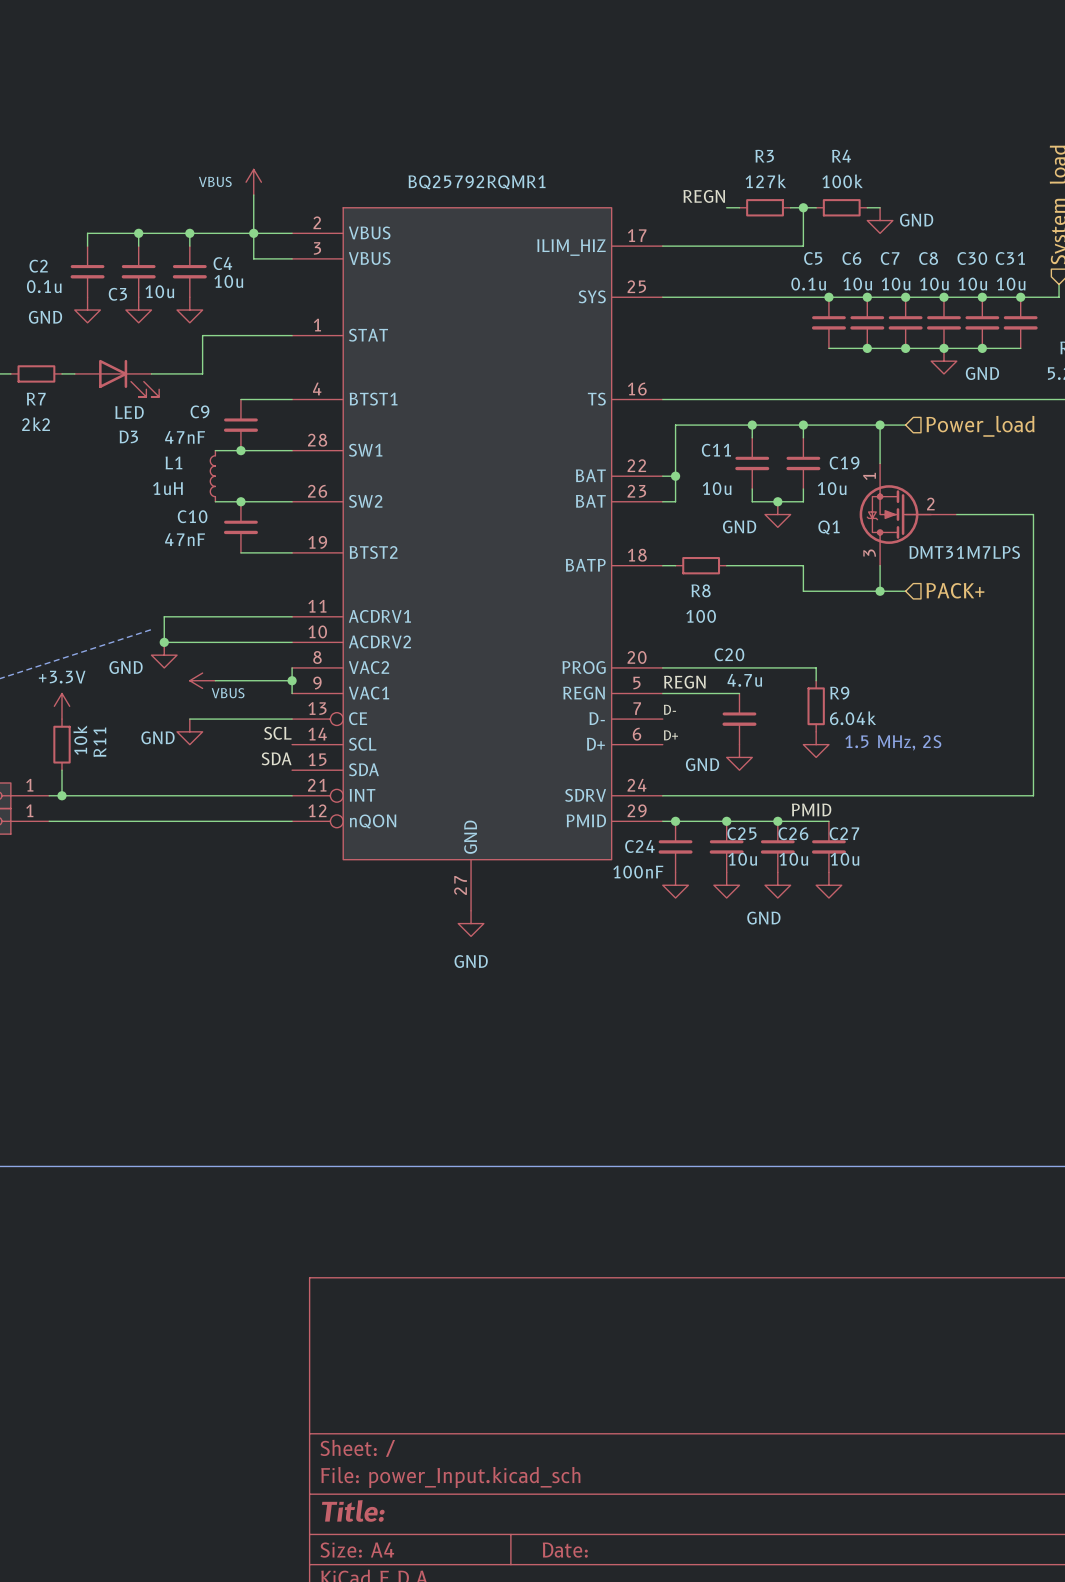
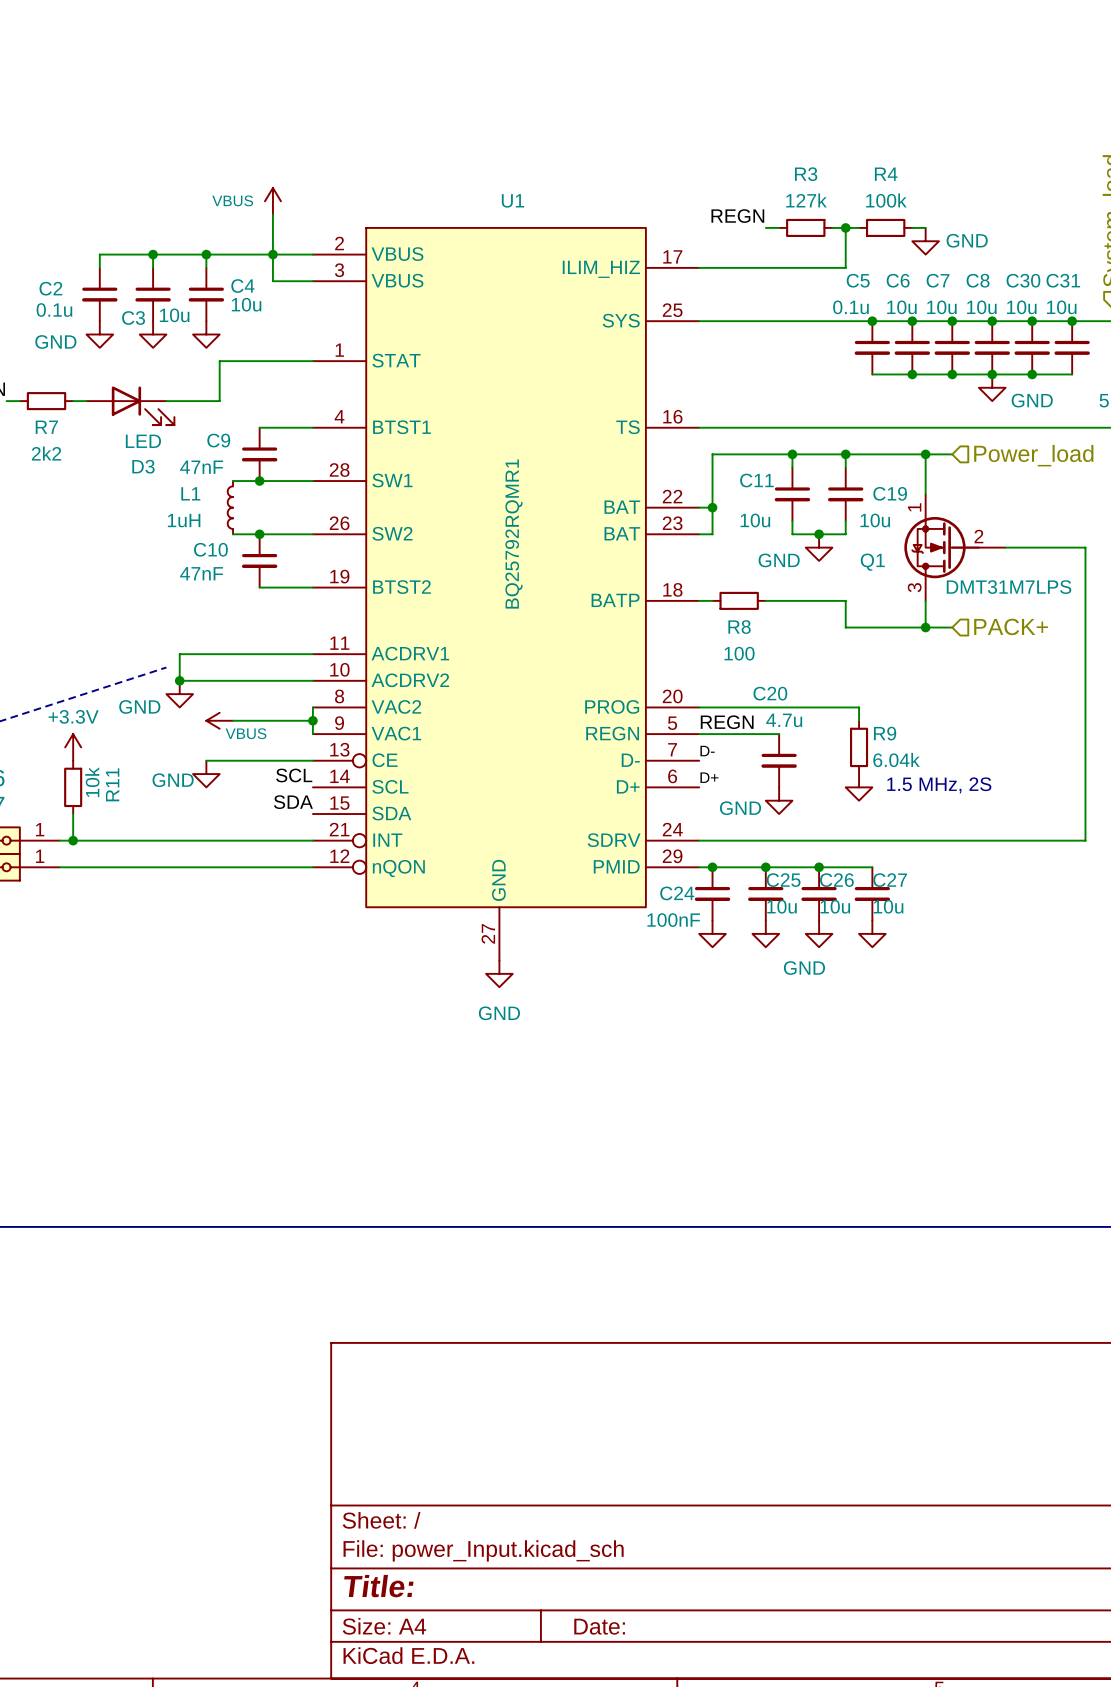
BQ25792RQMR1 name: BQ25792RQMR1 (477, 182) -> U1 (513, 200)
BQ25792RQMR1 value: none -> BQ25792RQMR1 (513, 533)
label: PMID (811, 809) -> none

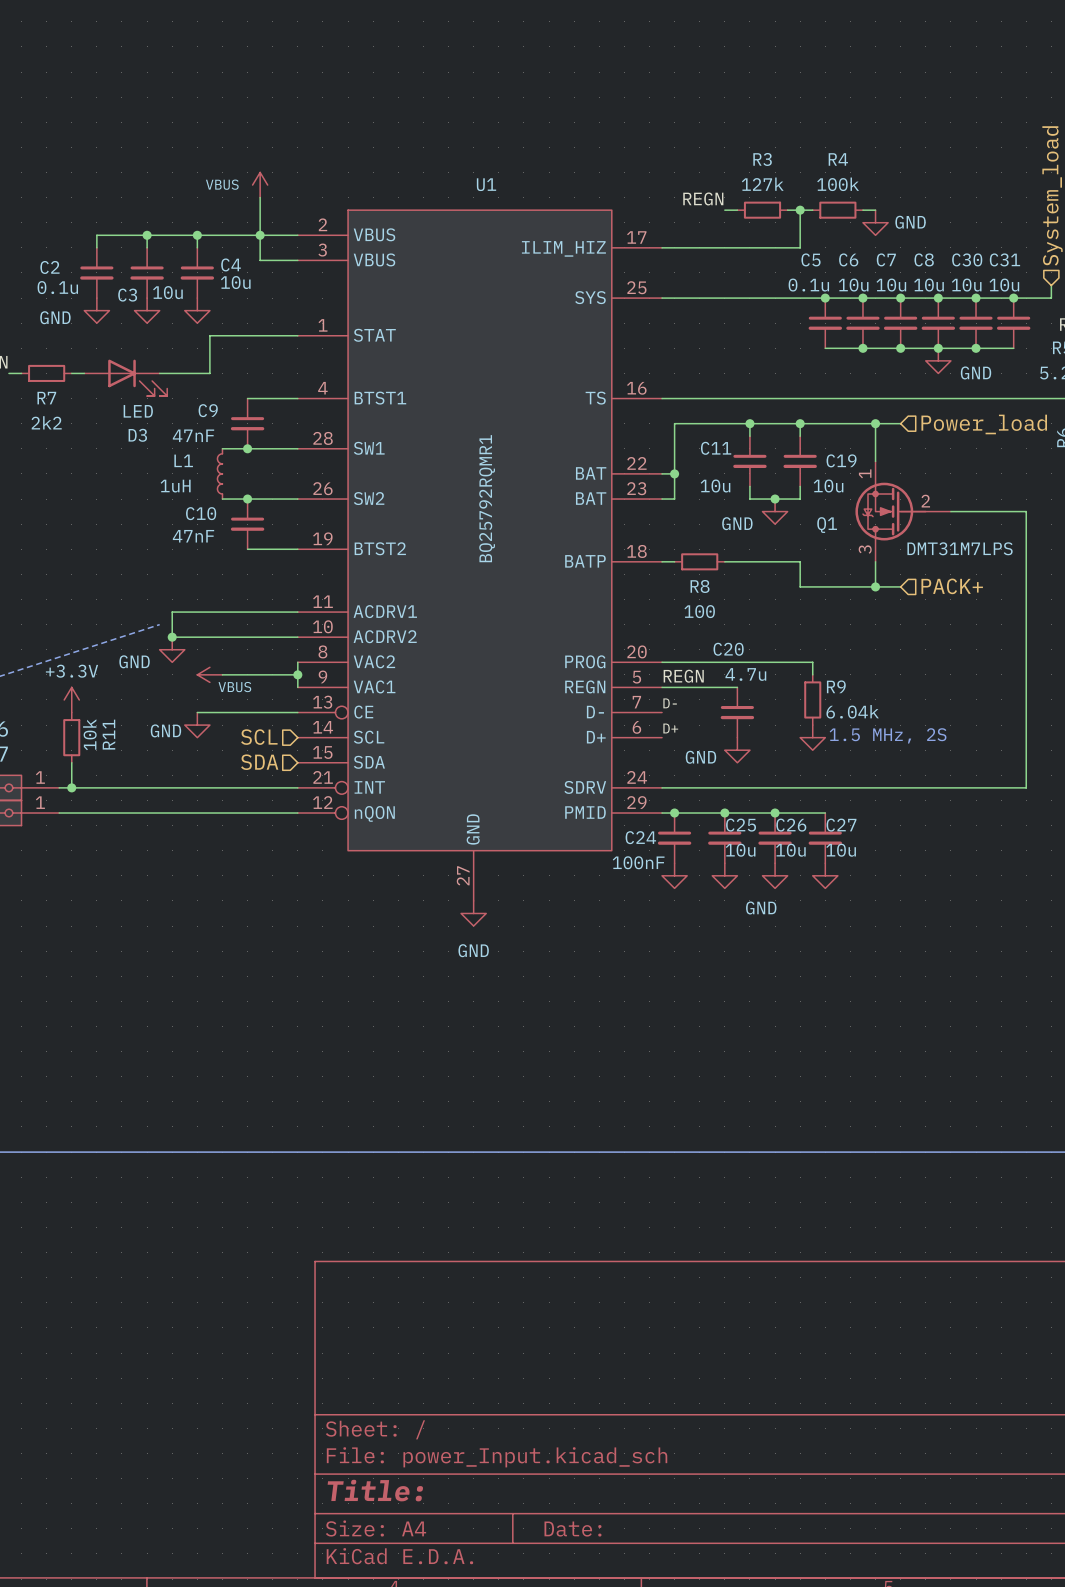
label: SCL (294, 775) -> none
hierarchical label: none -> SCL (259, 737)
label: SDA (293, 802) -> none
hierarchical label: none -> SDA (259, 762)

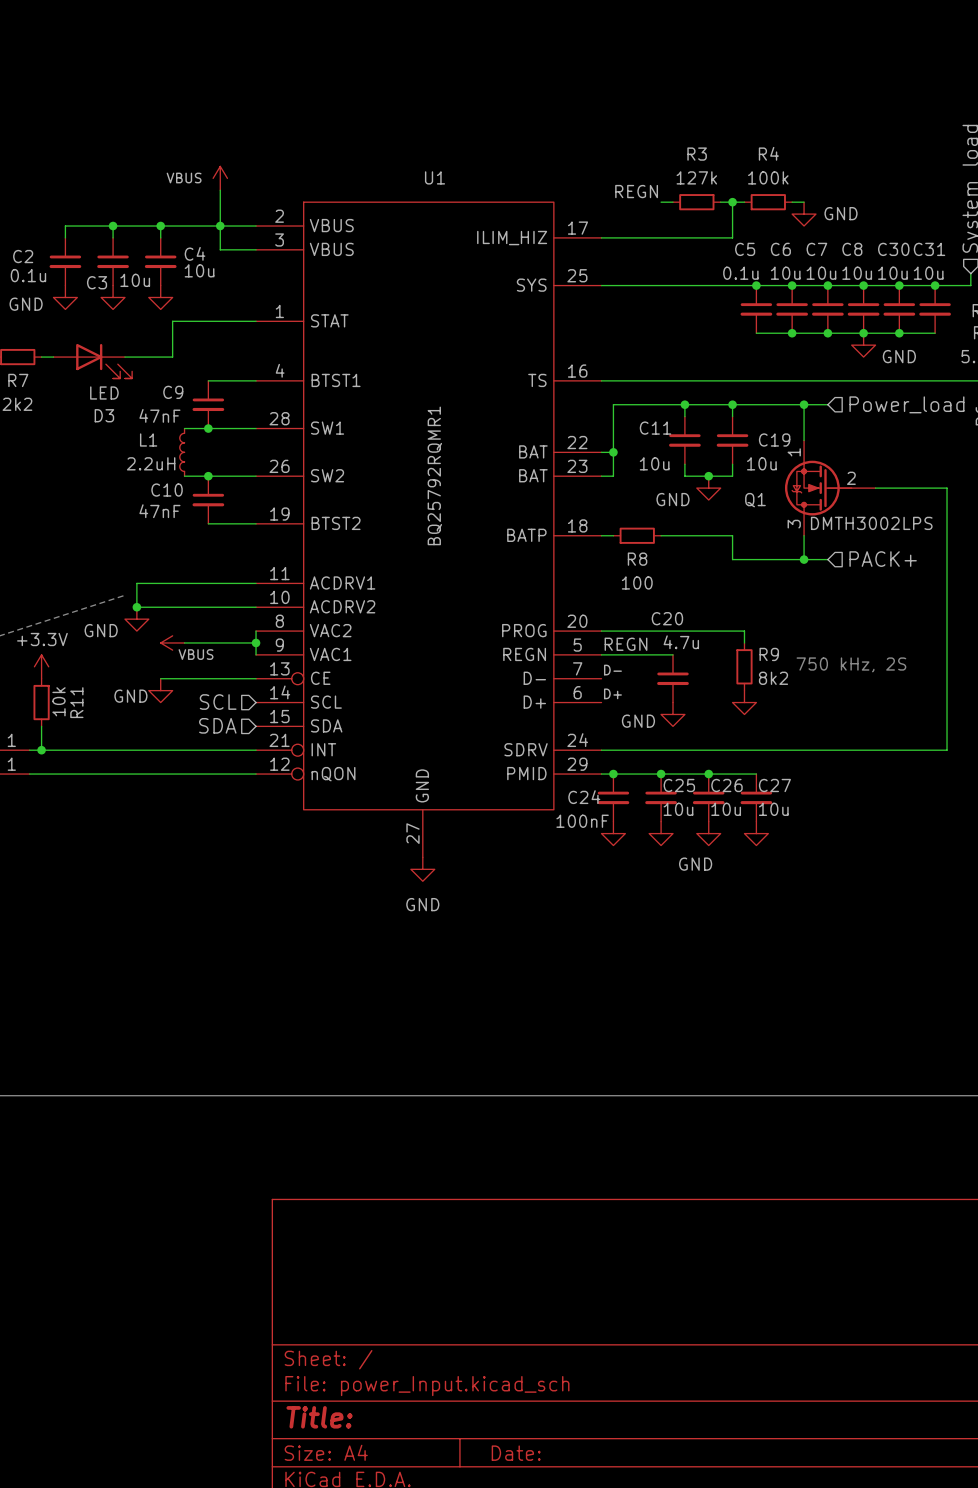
L1 value: 1uH (175, 486) -> 2.2uH (151, 463)
Q1 value: DMT31M7LPS (960, 548) -> DMTH3002LPS (871, 523)
text: none -> 750 kHz, 2S (851, 664)
R9 value: 6.04k (852, 711) -> 8k2 (773, 678)
text: 1.5 MHz, 2S (888, 735) -> none

